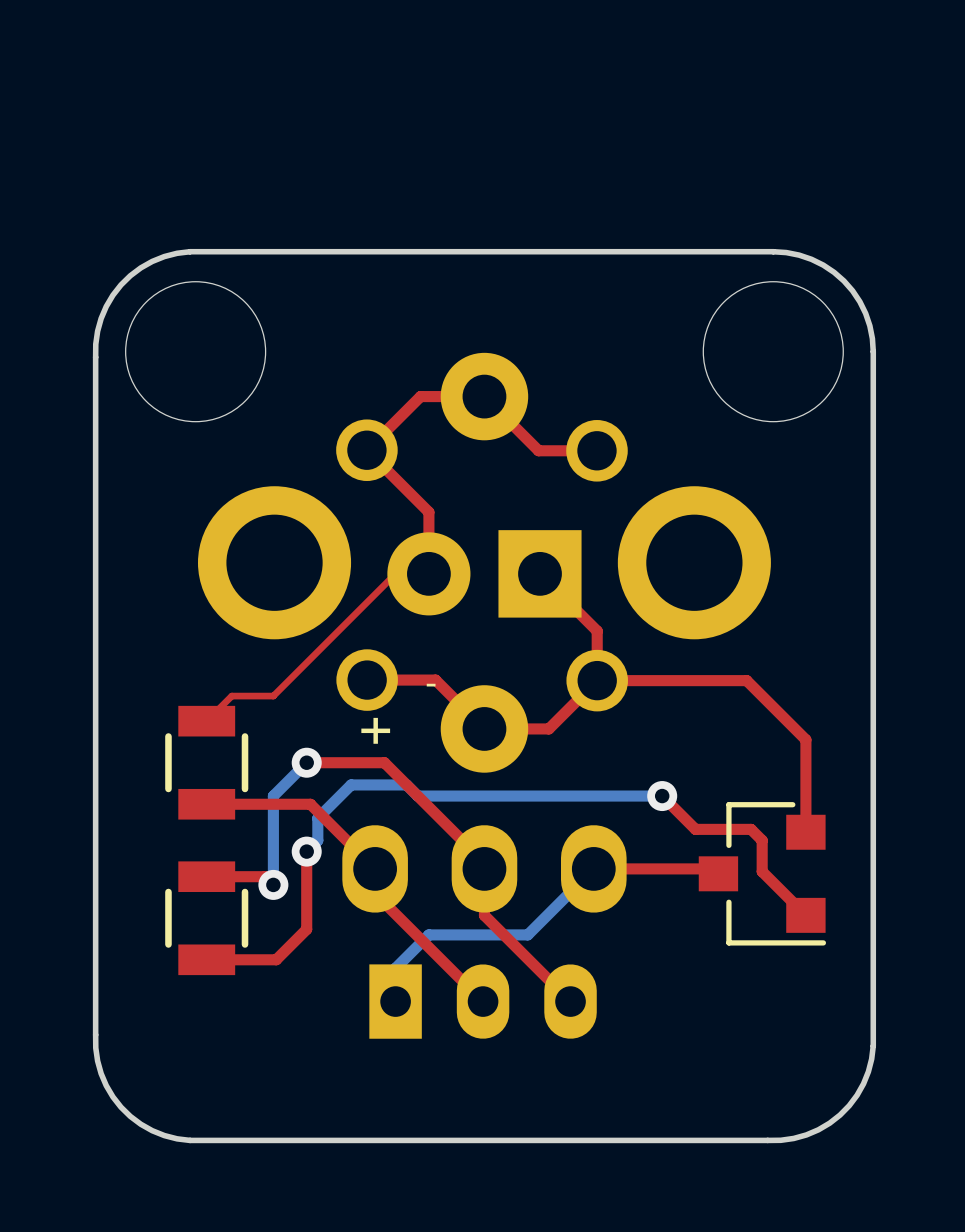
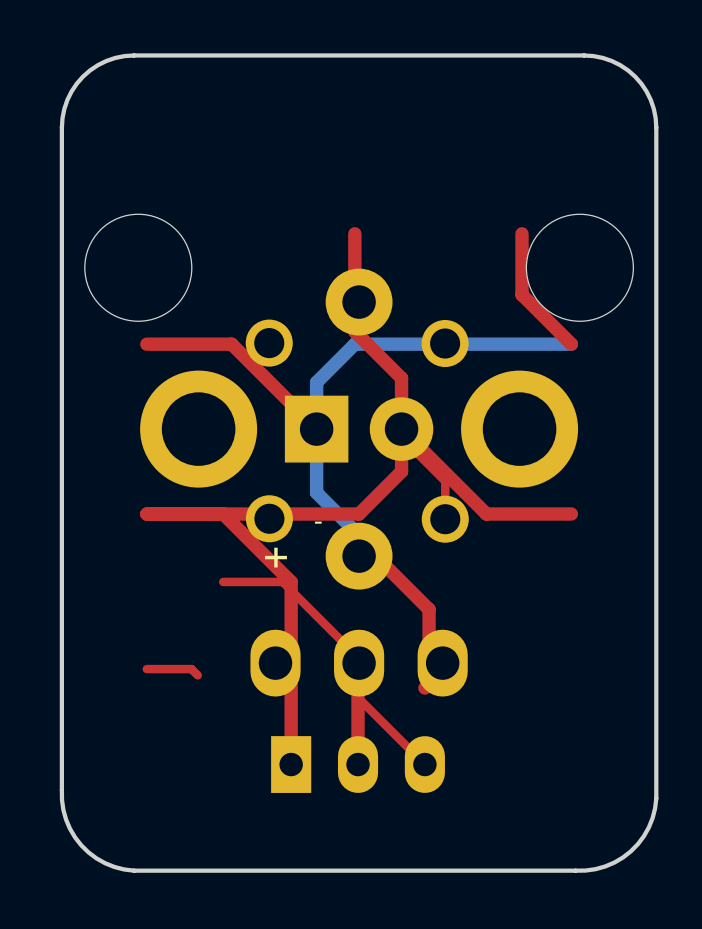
top track: none -> (354, 233) (354, 331) (401, 378) (401, 471) (359, 514) (146, 514) (168, 514)
top track: none -> (522, 233) (522, 294) (571, 344)
board edge: (873, 351) (872, 338) (865, 313) (859, 301) (843, 281) (823, 265) (799, 255) (786, 252) (190, 251) (177, 253) (152, 261) (130, 275) (121, 284) (112, 295) (101, 318) (97, 331) (95, 357) -> (656, 267) (656, 127) (653, 108) (641, 83) (628, 70) (611, 60) (584, 55) (134, 55) (115, 57) (90, 70) (71, 91) (64, 108) (61, 127) (61, 272)
top track: (596, 450) (538, 450) (484, 396) (420, 396) (366, 450) (428, 512) (428, 573) (395, 573) (273, 696) (231, 696) (206, 721) -> none
top track: none -> (146, 344) (231, 344) (316, 429)
bottom track: none -> (571, 344) (354, 344) (316, 382) (316, 492) (380, 556)
top track: none -> (401, 429) (486, 514) (571, 514)
part rotation: 0° (484, 573) -> 180° (359, 429)
top track: none -> (223, 514) (291, 581) (291, 764)
top track: (367, 680) (435, 680) (484, 728) (548, 728) (597, 680) (746, 680) (805, 739) (805, 832) -> none
top track: none -> (380, 556) (380, 560) (429, 609) (429, 683)
part: (206, 762) -> none
bottom track: (306, 762) (273, 796) (273, 884) -> none
via: (306, 762) -> none
top track: (662, 796) (695, 829) (751, 829) (762, 840) (762, 871) (805, 915) -> none
bottom track: (662, 796) (417, 796) (406, 784) (351, 784) (317, 818) (317, 840) (306, 851) -> none
via: (662, 796) -> none
top track: (206, 804) (310, 804) (375, 868) (375, 897) -> none
top track: (306, 851) (306, 929) (276, 959) (206, 959) -> none
via: (306, 851) -> none
top track: (593, 868) (713, 868) (718, 873) -> none
bottom track: (593, 868) (527, 934) (428, 934) (395, 968) (395, 1001) -> none
part: (762, 873) -> none
via: (273, 884) -> none
top track: (375, 893) (483, 1001) -> (358, 691) (358, 764)
top track: none -> (429, 683) (424, 688) (429, 683)
part: (206, 918) -> none

